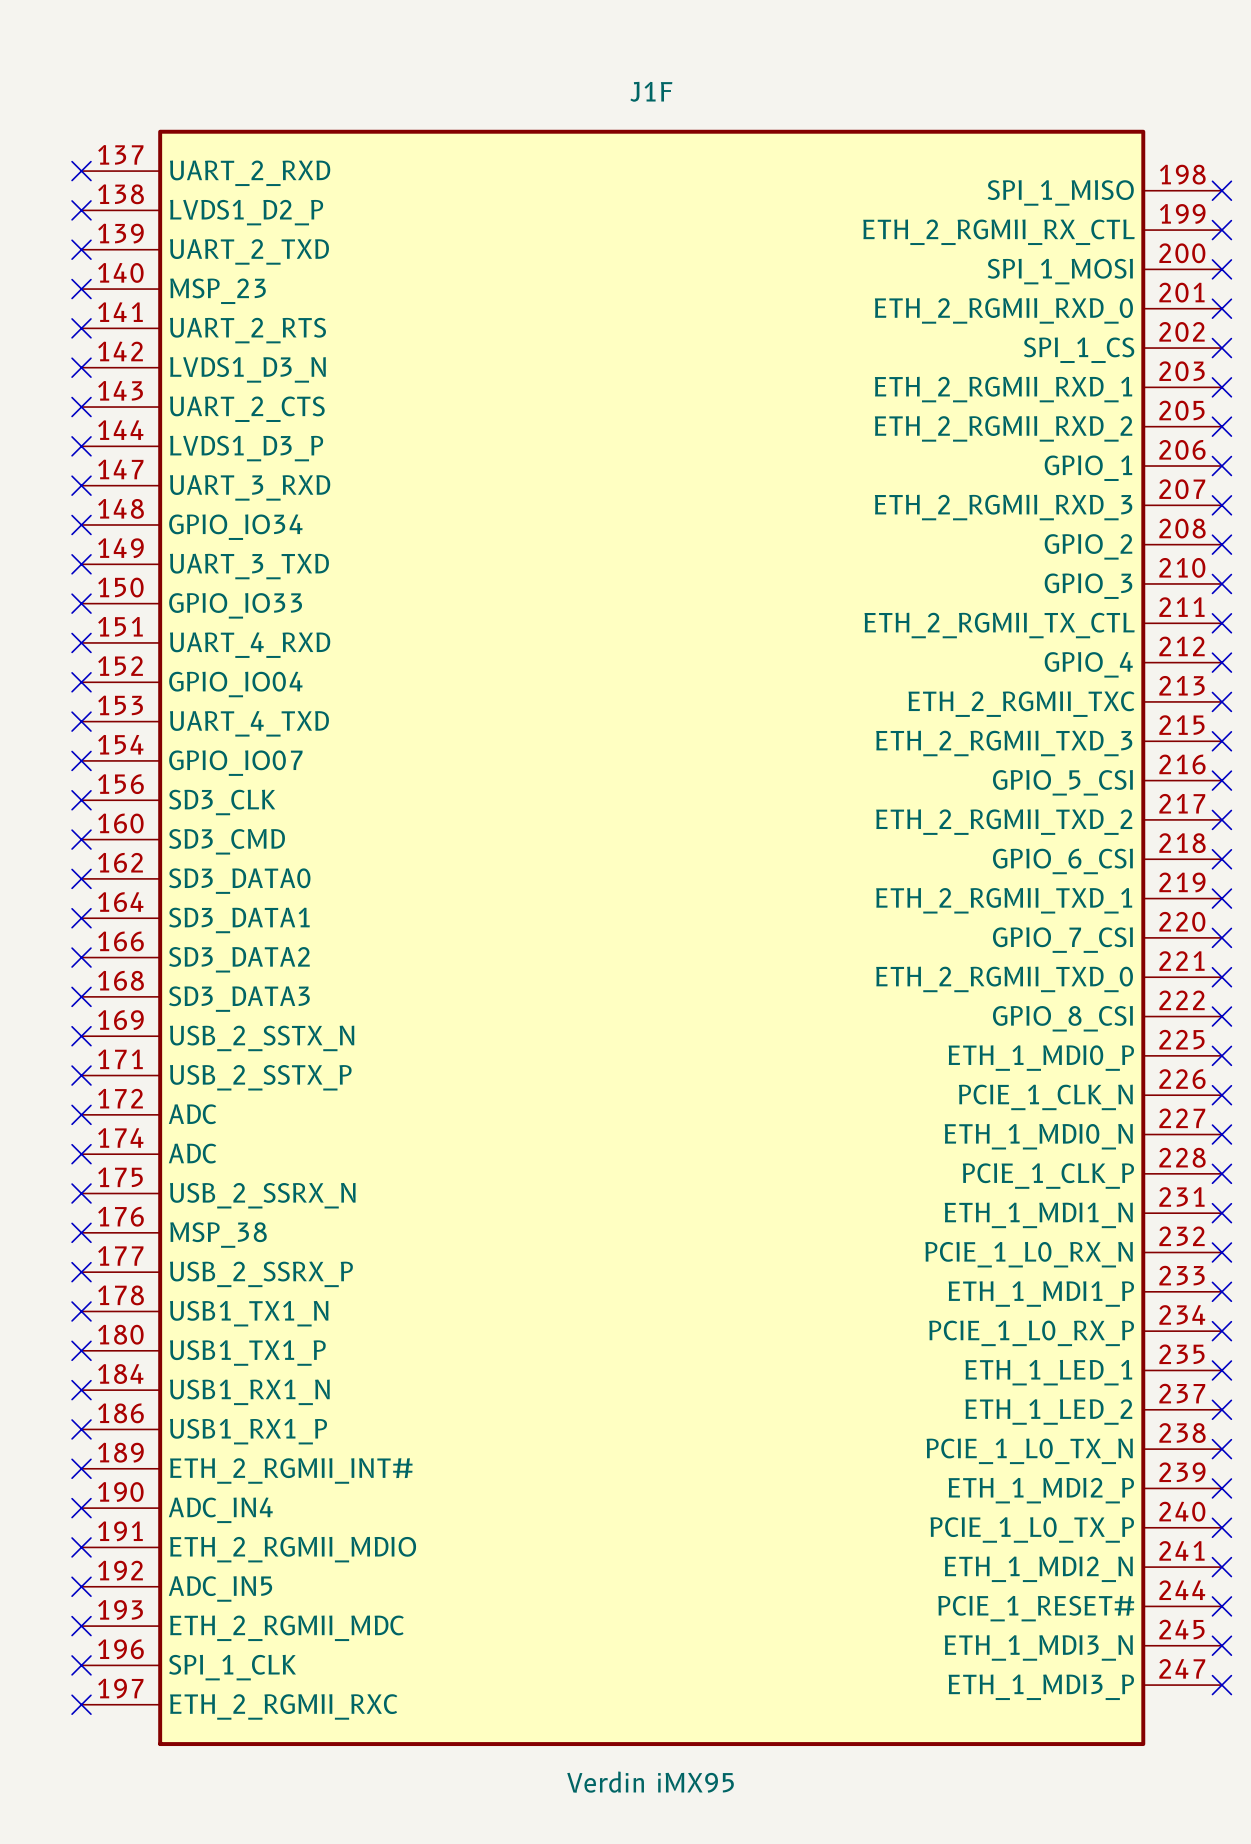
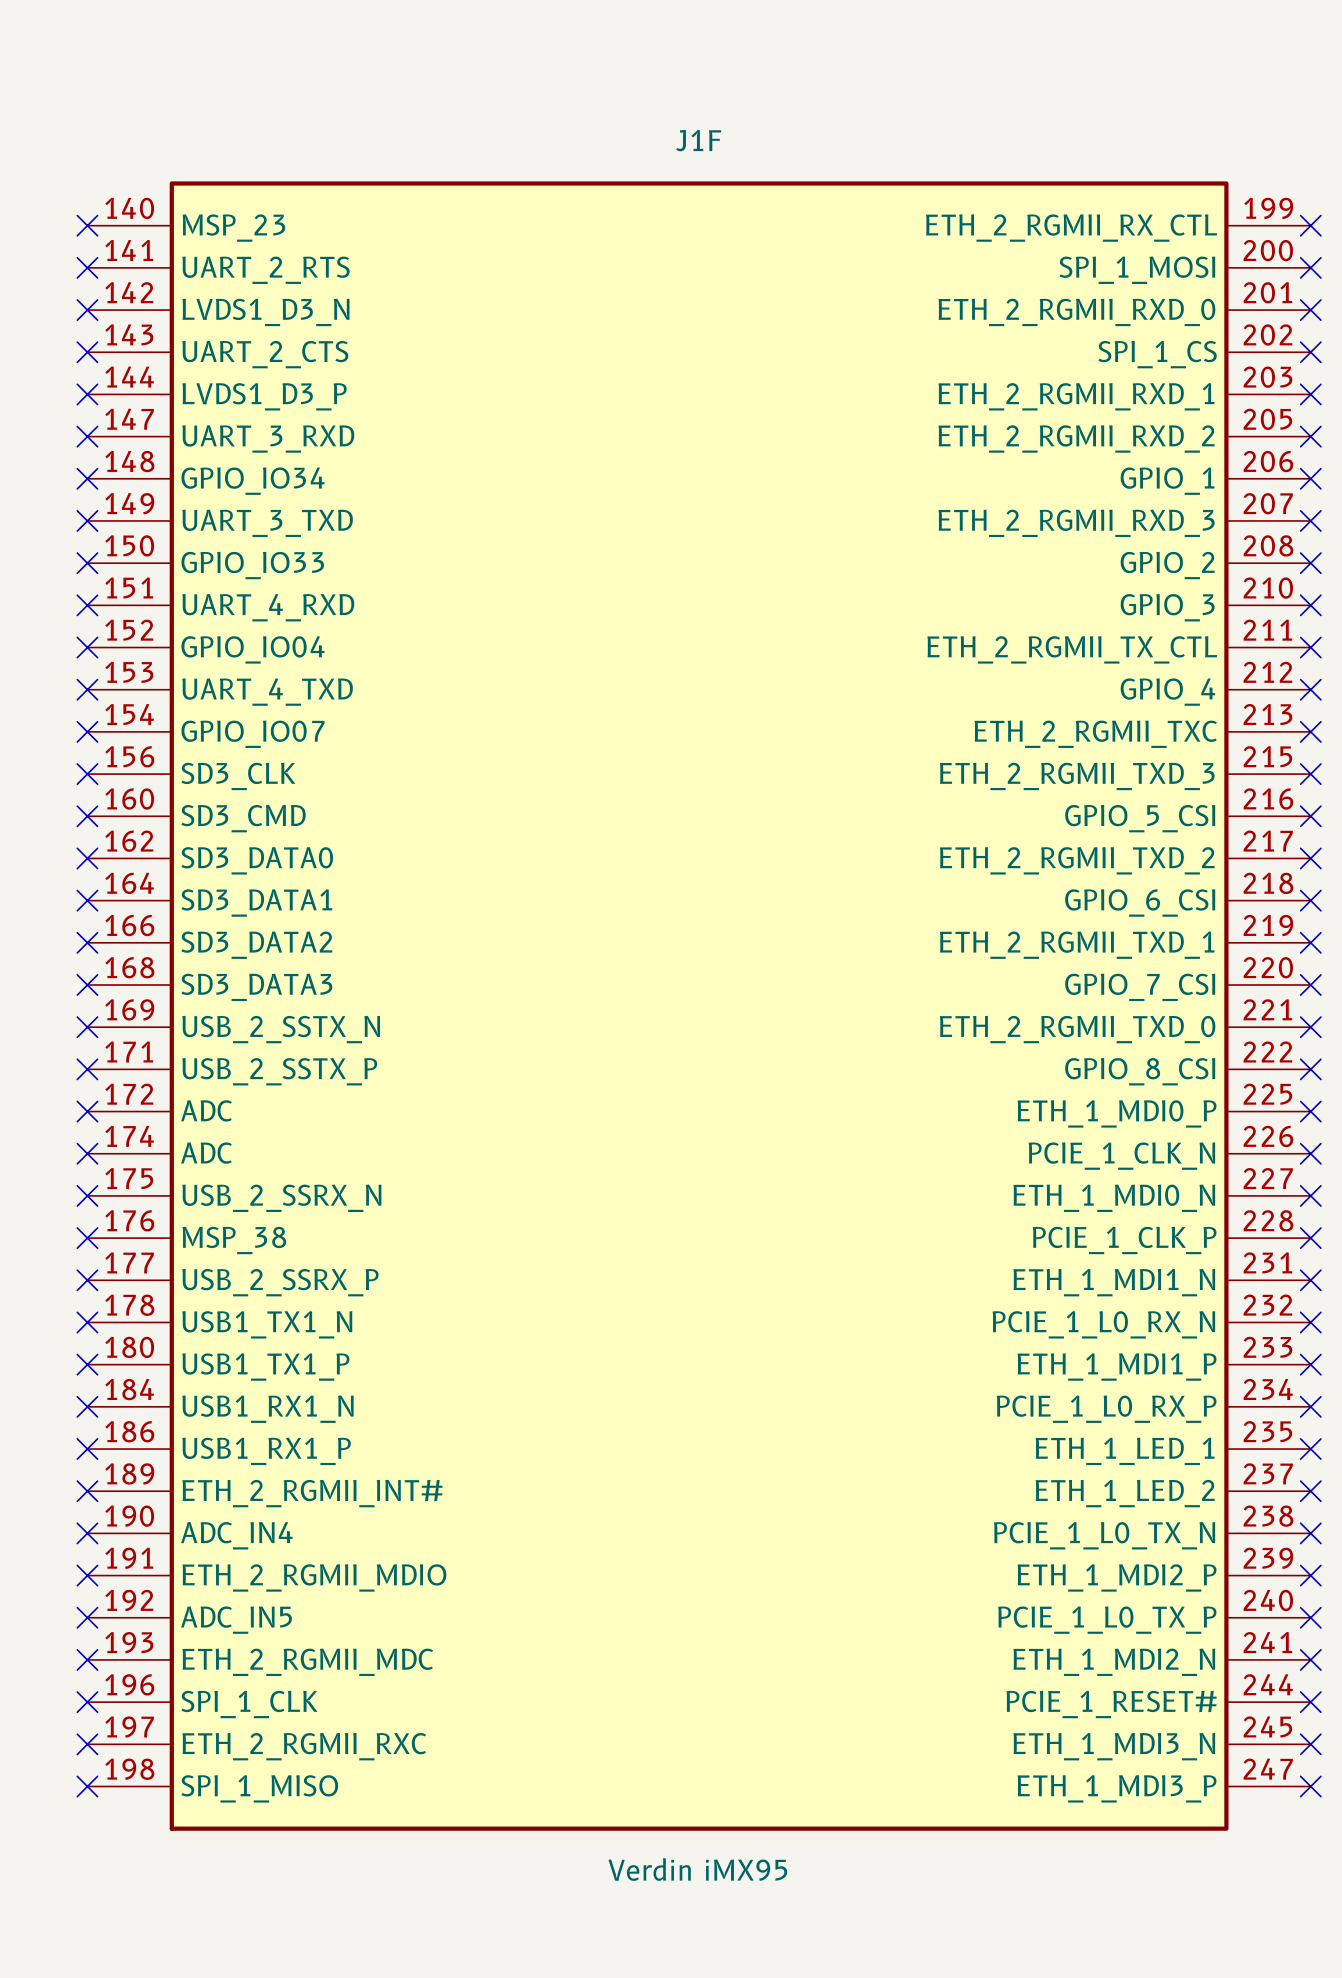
J1F name position: J1F (651, 91) -> J1F (698, 140)
J1F symbol: [81, 129, 1222, 1747] -> [87, 181, 1311, 1831]
no-connect mark: (81, 171) -> none
no-connect mark: (1221, 190) -> none
no-connect mark: none -> (1310, 225)
no-connect mark: (1221, 230) -> none
no-connect mark: none -> (1310, 267)
no-connect mark: (1221, 269) -> none
no-connect mark: none -> (1310, 310)
no-connect mark: (1221, 308) -> none
no-connect mark: none -> (1310, 352)
no-connect mark: (1221, 348) -> none
no-connect mark: none -> (1310, 394)
no-connect mark: (1221, 387) -> none
no-connect mark: none -> (1310, 436)
no-connect mark: (1221, 426) -> none
no-connect mark: none -> (1310, 478)
no-connect mark: (1221, 466) -> none
no-connect mark: none -> (1310, 520)
no-connect mark: (1221, 505) -> none
no-connect mark: none -> (1310, 563)
no-connect mark: (1221, 544) -> none
no-connect mark: none -> (1310, 605)
no-connect mark: (1221, 583) -> none
no-connect mark: none -> (1310, 647)
no-connect mark: (1221, 623) -> none
no-connect mark: none -> (1310, 689)
no-connect mark: (1221, 662) -> none
no-connect mark: none -> (1310, 731)
no-connect mark: (1221, 701) -> none
no-connect mark: none -> (1310, 774)
no-connect mark: (1221, 741) -> none
no-connect mark: none -> (1310, 816)
no-connect mark: (1221, 780) -> none
no-connect mark: none -> (1310, 858)
no-connect mark: (1221, 819) -> none
no-connect mark: none -> (1310, 900)
no-connect mark: (1221, 859) -> none
no-connect mark: none -> (1310, 942)
no-connect mark: (1221, 898) -> none
no-connect mark: none -> (1310, 985)
no-connect mark: (1221, 937) -> none
no-connect mark: none -> (1310, 1027)
no-connect mark: (1221, 977) -> none
no-connect mark: none -> (1310, 1069)
no-connect mark: (1221, 1016) -> none
no-connect mark: none -> (1310, 1111)
no-connect mark: (1221, 1055) -> none
no-connect mark: none -> (1310, 1153)
no-connect mark: (1221, 1095) -> none
no-connect mark: none -> (1310, 1195)
no-connect mark: (1221, 1134) -> none
no-connect mark: none -> (1310, 1238)
no-connect mark: (1221, 1173) -> none
no-connect mark: none -> (1310, 1280)
no-connect mark: (1221, 1213) -> none
no-connect mark: none -> (1310, 1322)
no-connect mark: (1221, 1252) -> none
no-connect mark: none -> (1310, 1364)
no-connect mark: (1221, 1291) -> none
no-connect mark: none -> (1310, 1406)
no-connect mark: (1221, 1331) -> none
no-connect mark: none -> (1310, 1449)
no-connect mark: (1221, 1370) -> none
no-connect mark: none -> (1310, 1491)
no-connect mark: (1221, 1409) -> none
no-connect mark: none -> (1310, 1533)
no-connect mark: (1221, 1449) -> none
no-connect mark: none -> (1310, 1575)
no-connect mark: (1221, 1488) -> none
no-connect mark: none -> (1310, 1617)
no-connect mark: (1221, 1527) -> none
no-connect mark: none -> (1310, 1659)
no-connect mark: (1221, 1567) -> none
no-connect mark: none -> (1310, 1702)
no-connect mark: (1221, 1606) -> none
no-connect mark: none -> (1310, 1744)
no-connect mark: (1221, 1645) -> none
no-connect mark: none -> (1310, 1786)
no-connect mark: (1221, 1685) -> none
no-connect mark: (81, 1704) -> none
J1F value position: Verdin iMX95 (650, 1782) -> Verdin iMX95 (697, 1869)

